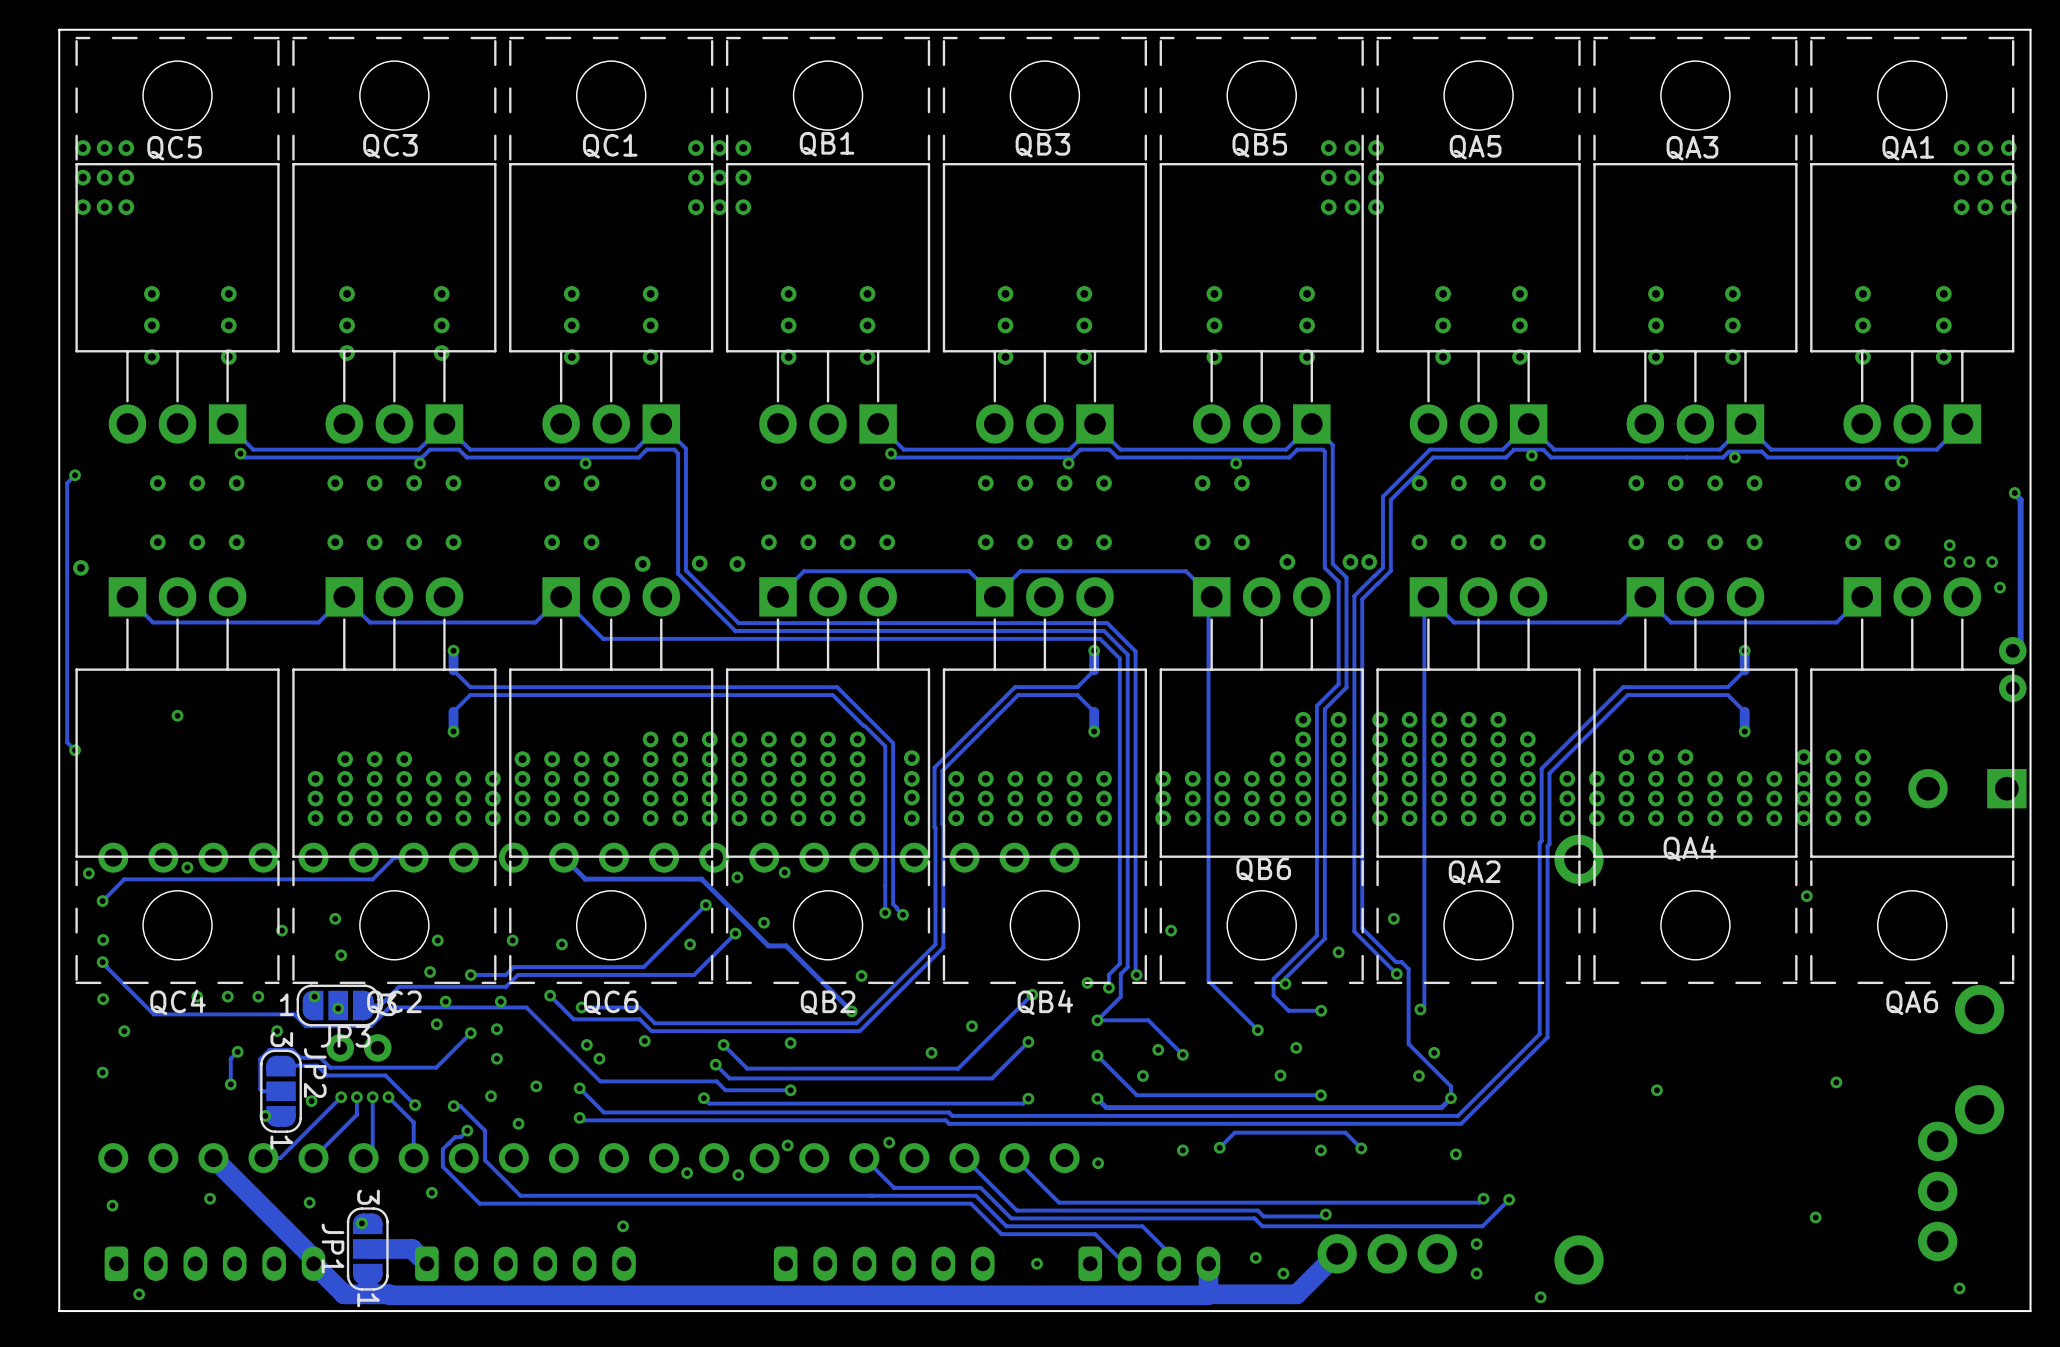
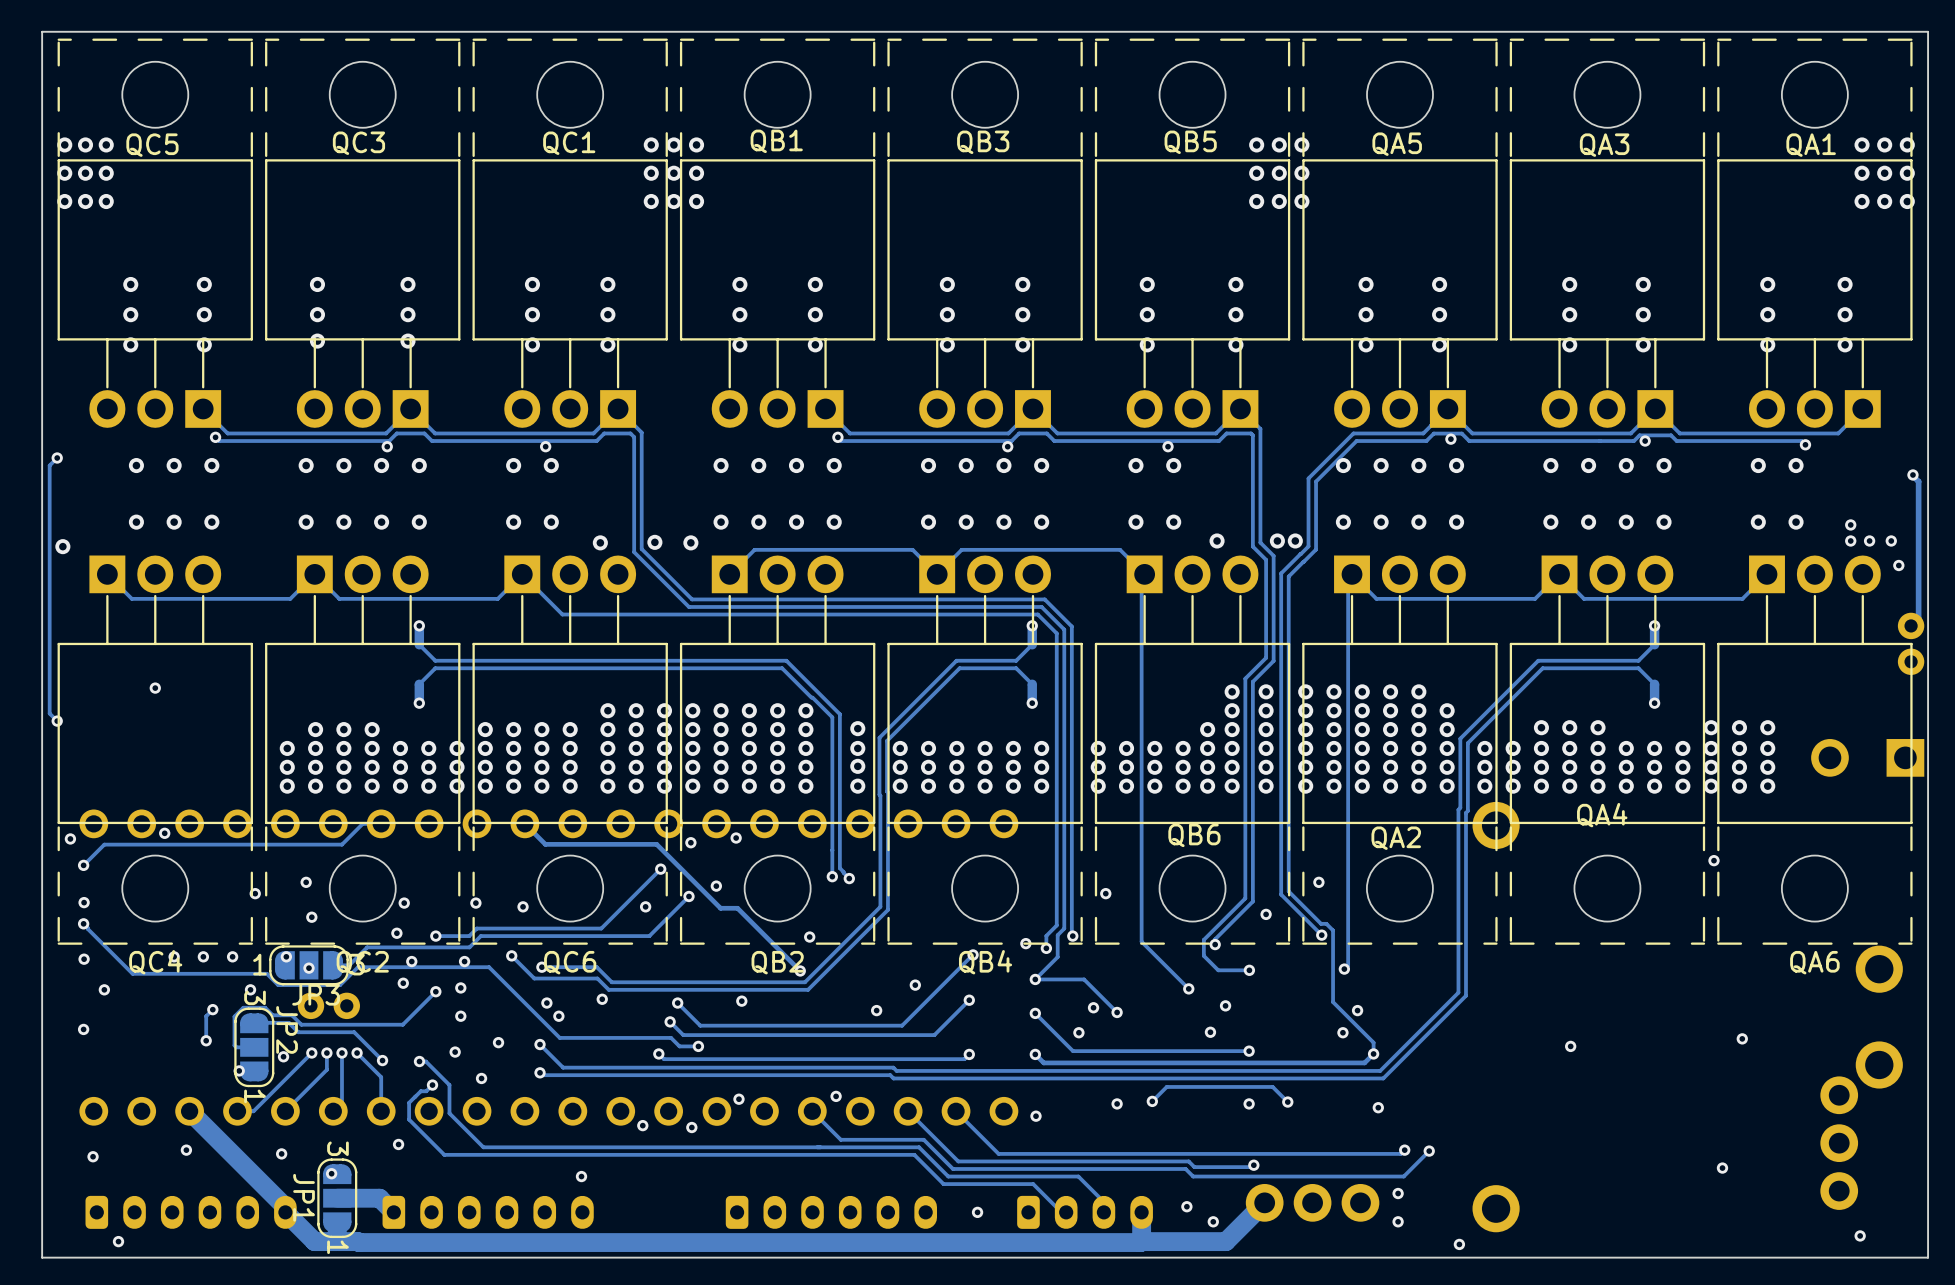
track: (790, 1090) (745, 1090) -> none
via position: (790, 1090) -> (698, 1046)

